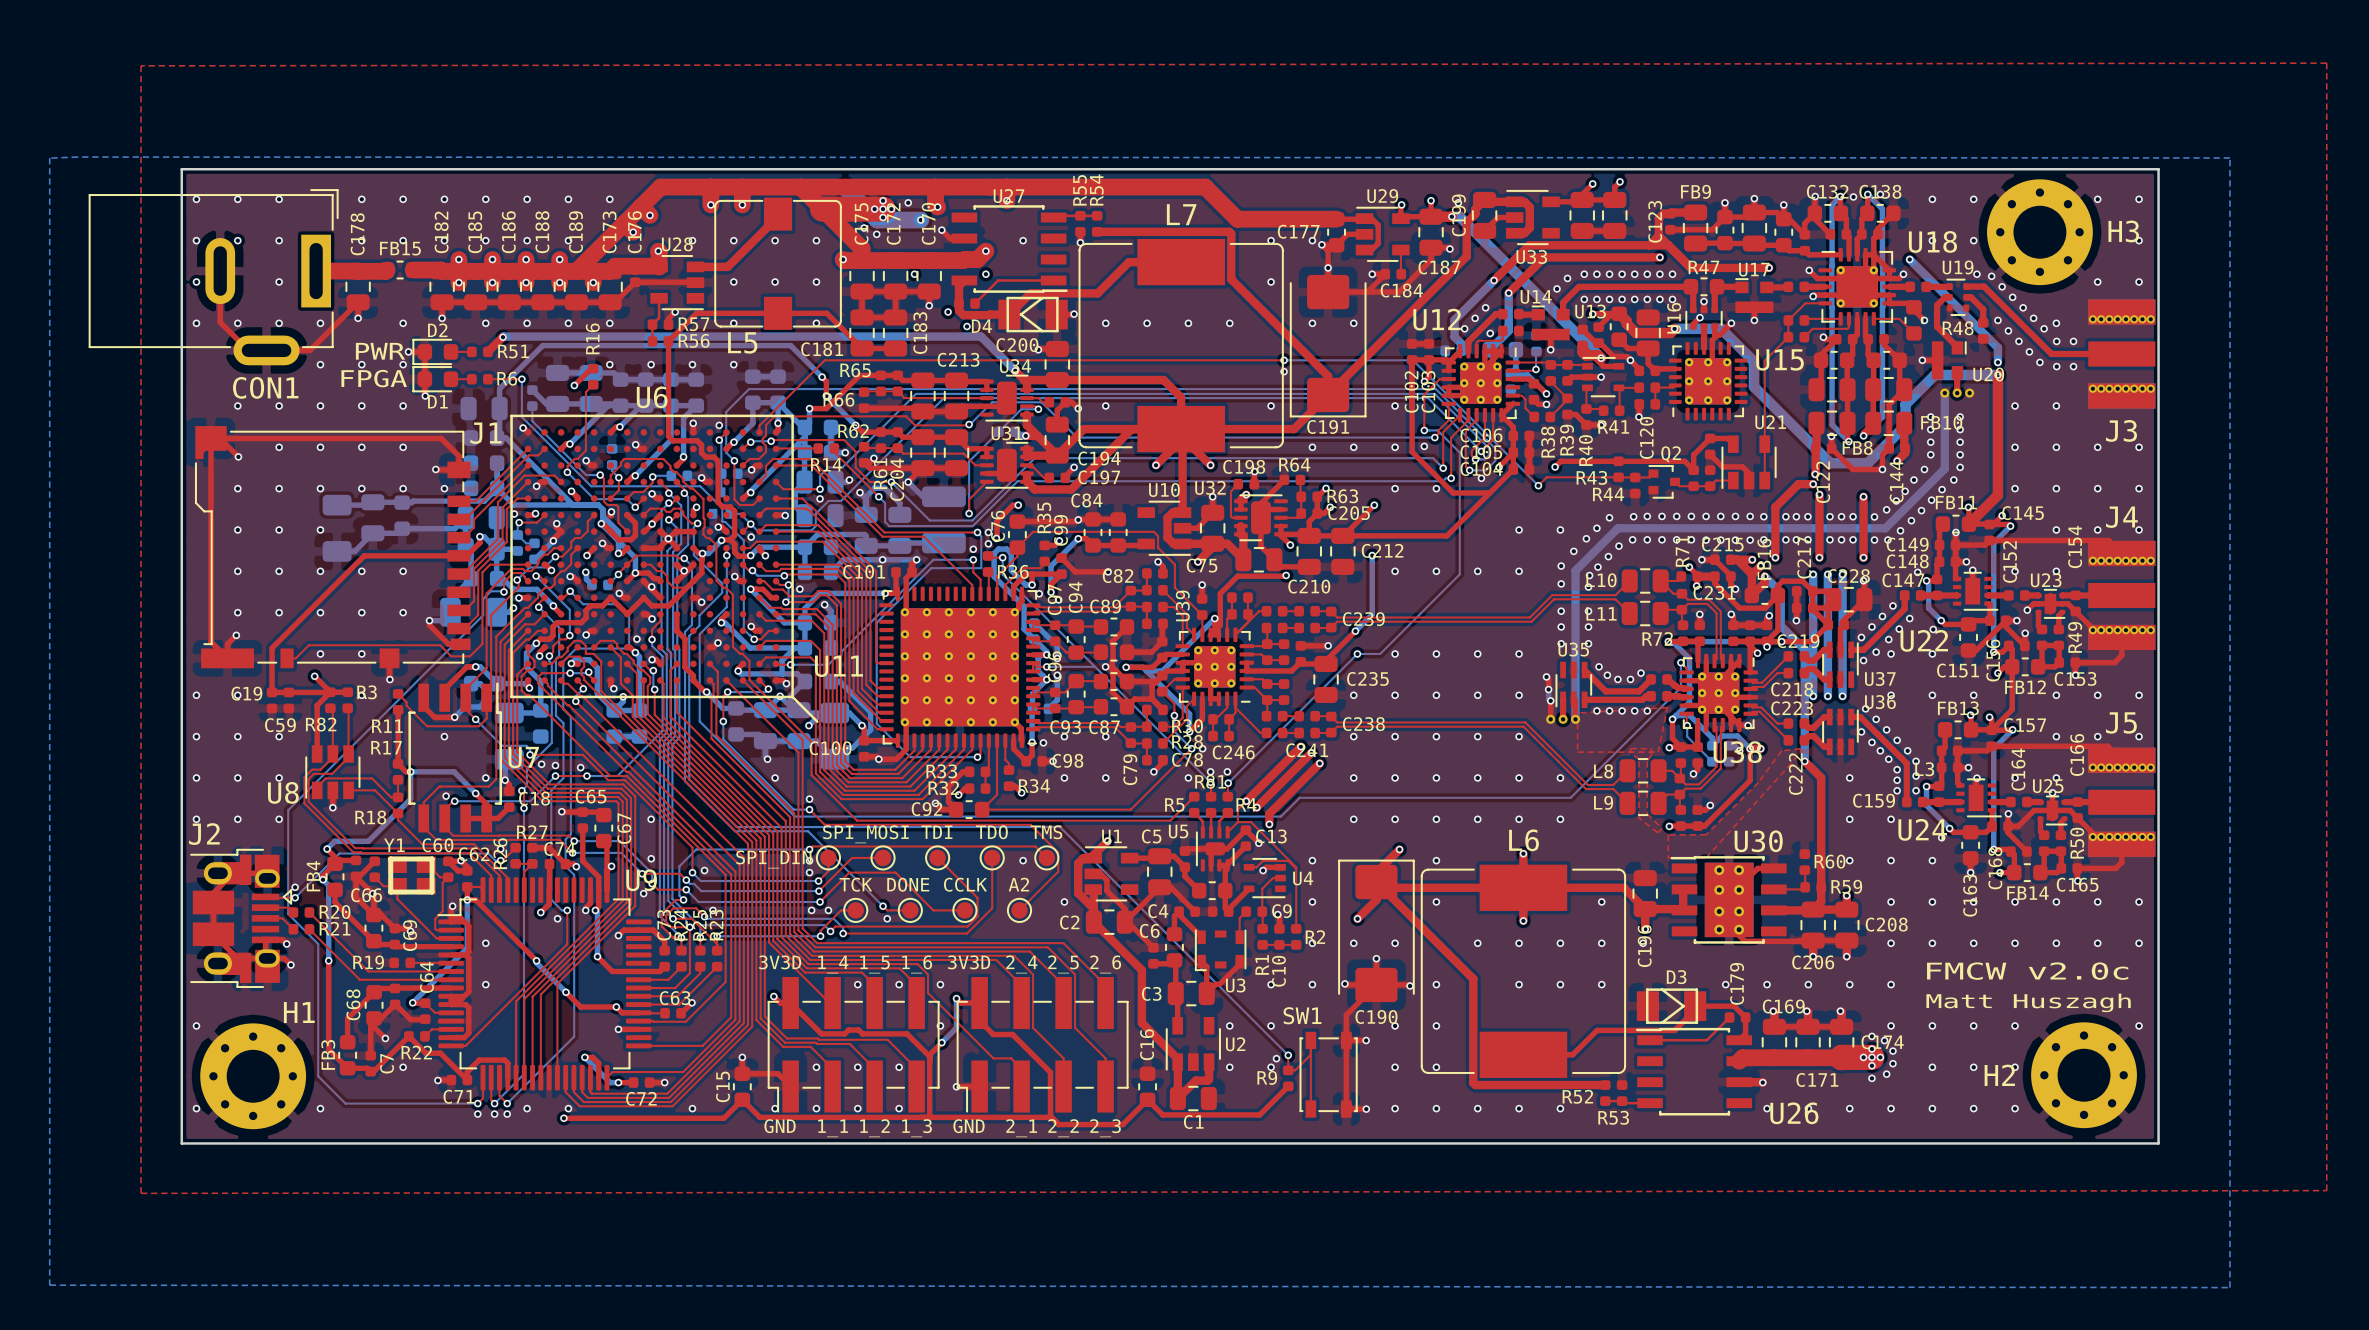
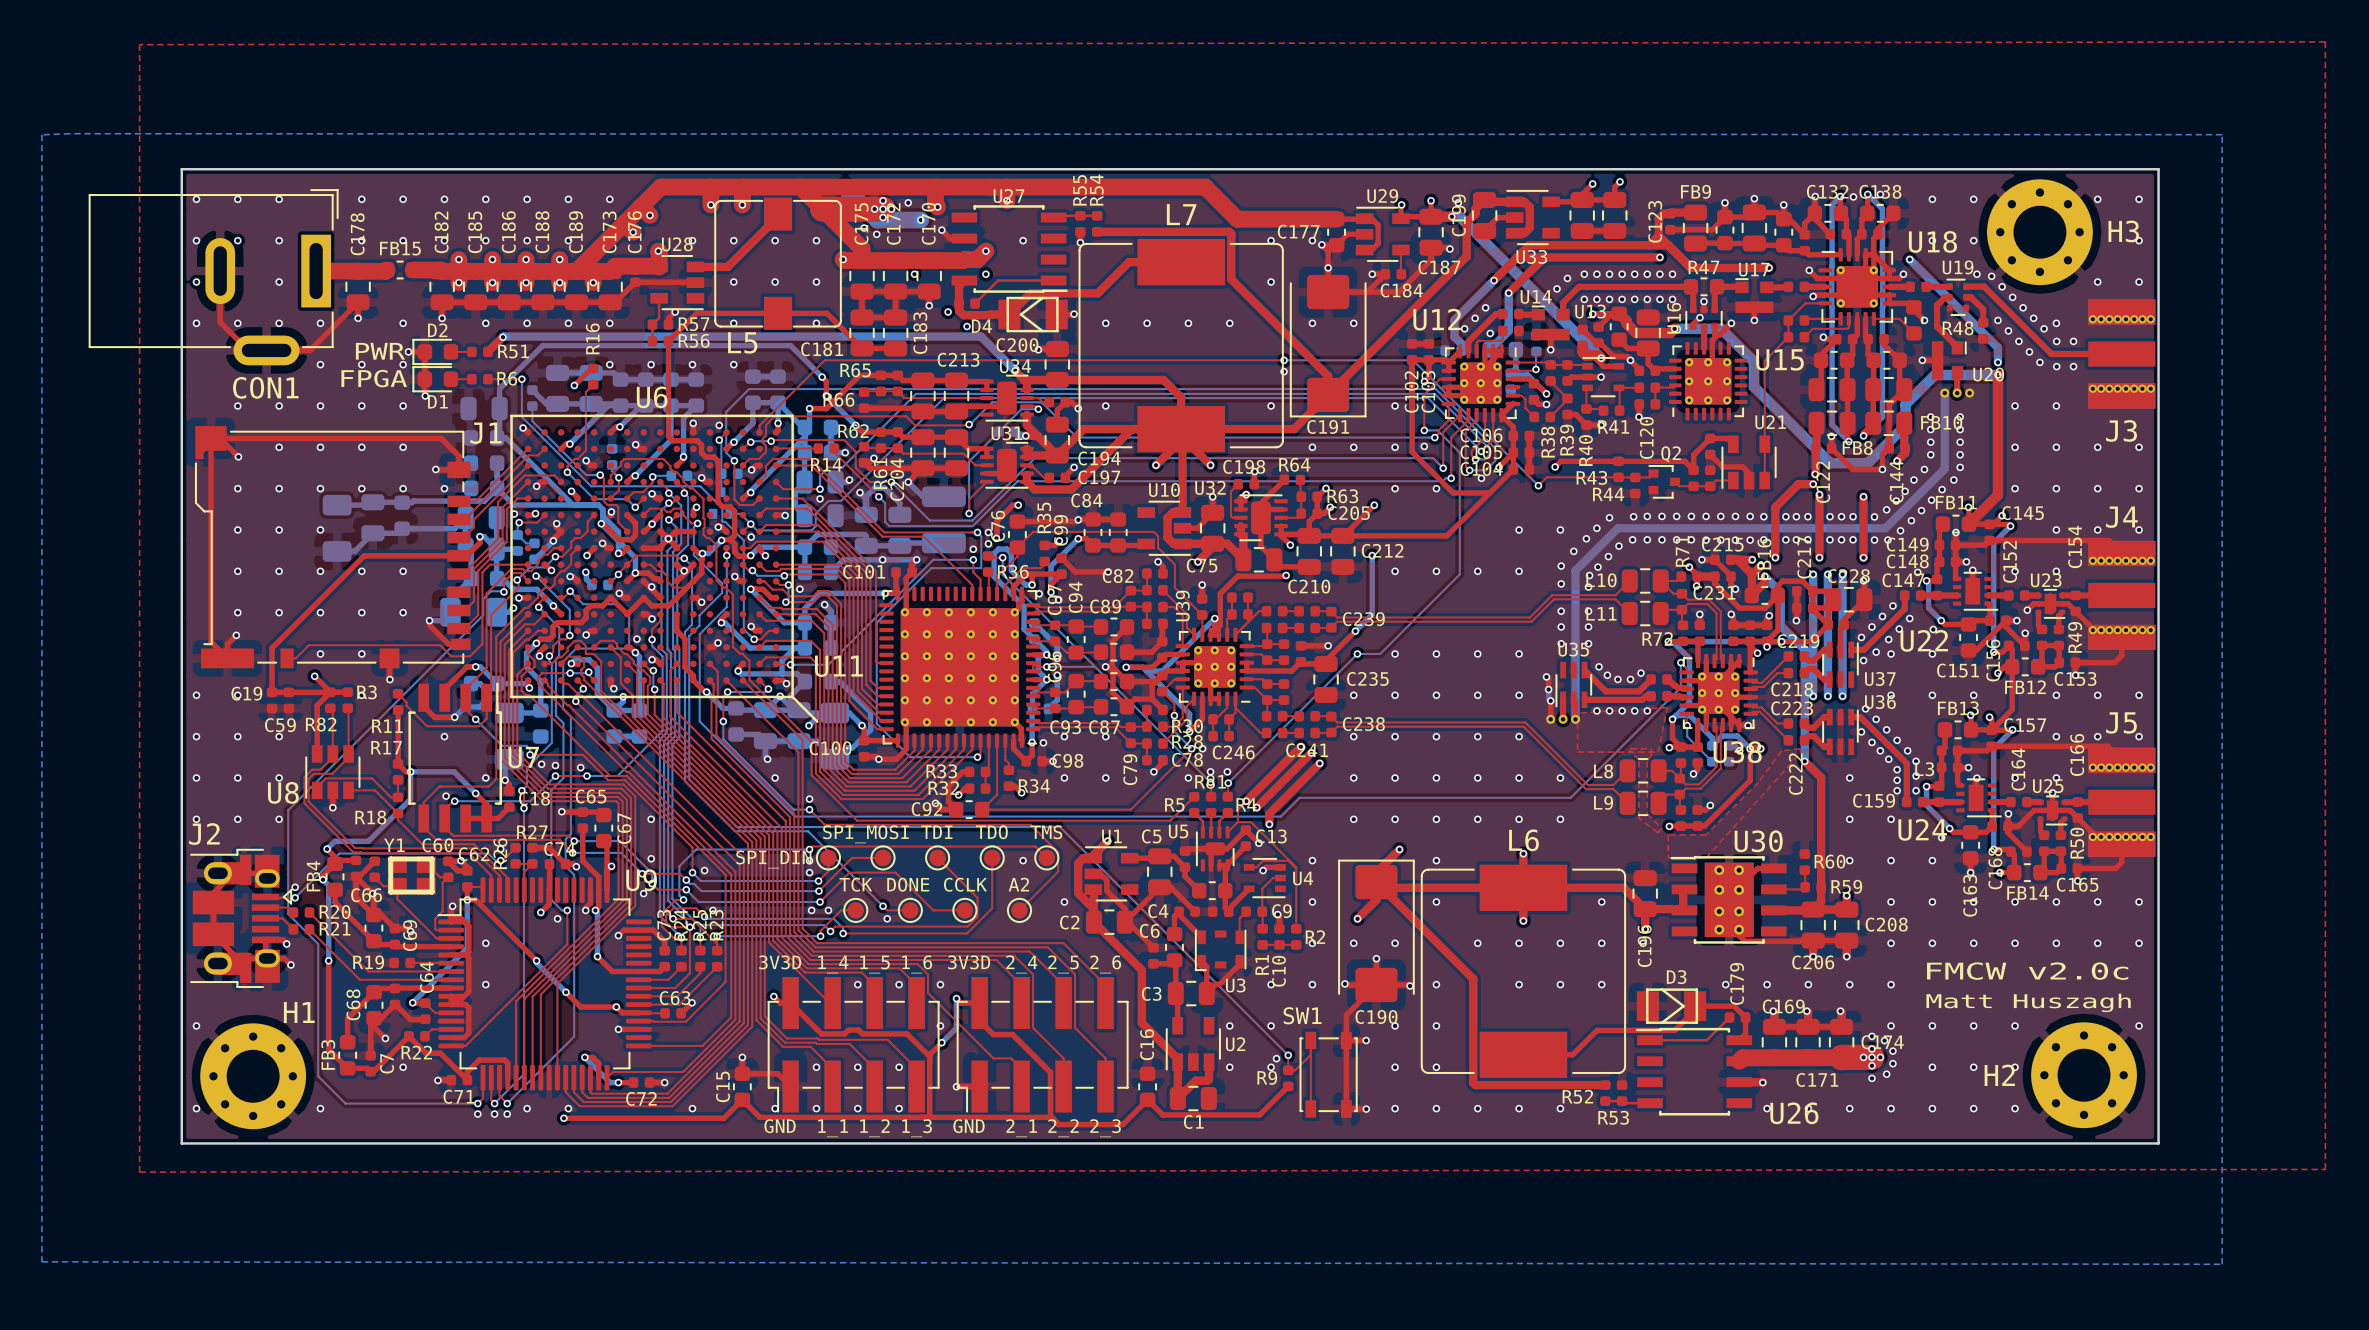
top zone outline: (2326, 63) (2326, 1190) (141, 1193) (141, 65) (2326, 63) -> (2325, 41) (2325, 1169) (139, 1172) (139, 44) (2325, 41)
bottom zone outline: (77, 157) (49, 158) (49, 1285) (2229, 1287) (2229, 157) (77, 157) -> (70, 133) (41, 134) (41, 1261) (2222, 1264) (2222, 134) (70, 133)

